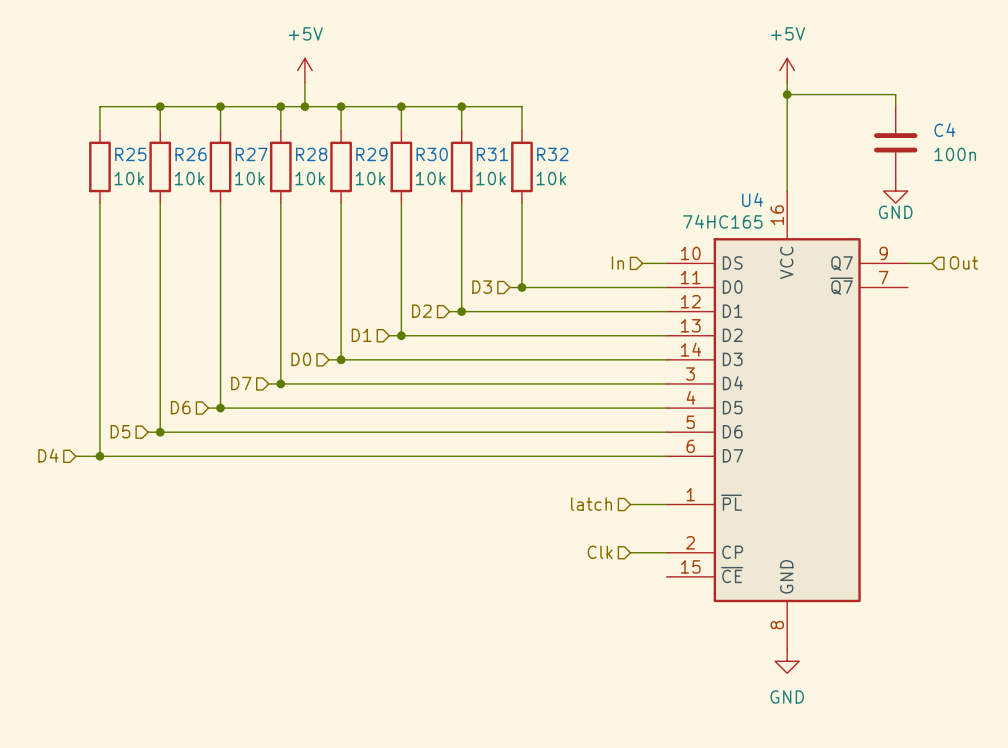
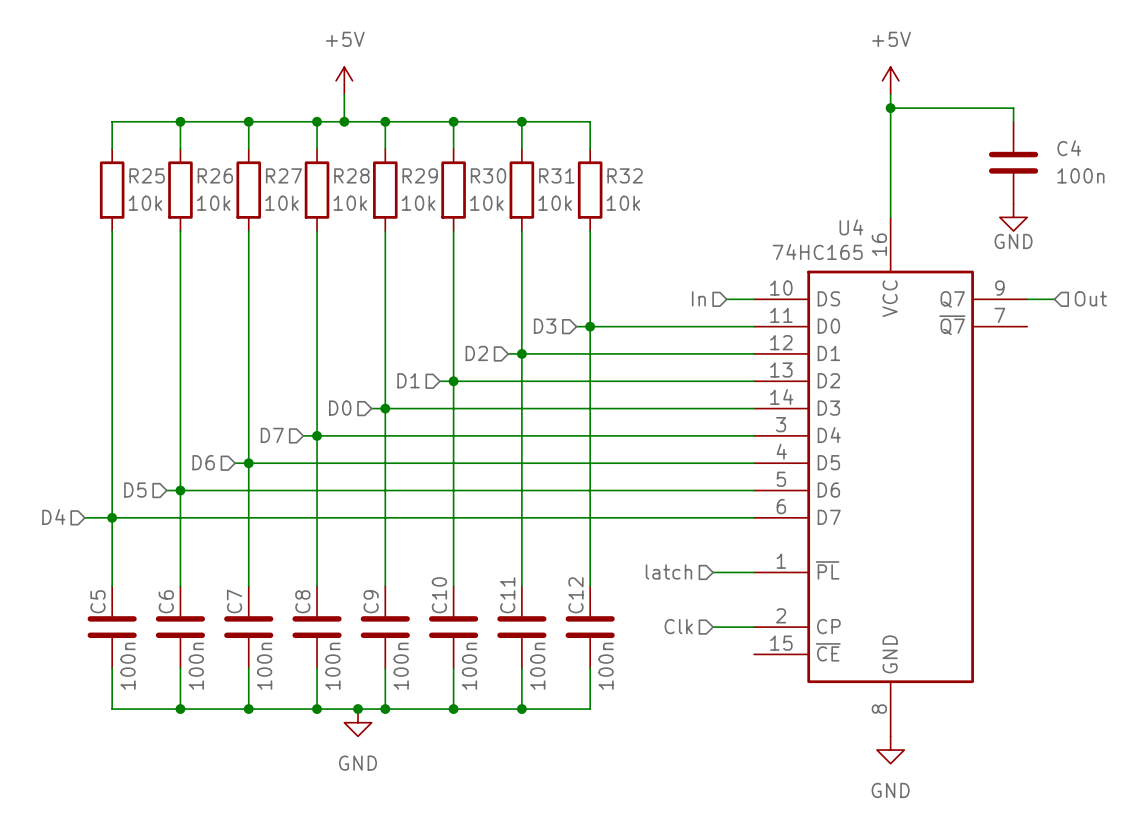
wire: none -> (590, 326) (590, 586)
wire: none -> (521, 353) (521, 586)
wire: none -> (453, 381) (453, 586)
wire: none -> (385, 408) (385, 586)
wire: none -> (317, 435) (317, 586)
wire: none -> (248, 463) (248, 586)
wire: none -> (180, 490) (180, 586)
wire: none -> (112, 517) (112, 586)
C5: none -> 100n (112, 627)
C6: none -> 100n (180, 627)
C7: none -> 100n (248, 627)
C8: none -> 100n (317, 627)
C9: none -> 100n (385, 627)
C10: none -> 100n (453, 627)
C11: none -> 100n (521, 627)
C12: none -> 100n (590, 627)
wire: none -> (112, 668) (112, 709) (590, 709) (590, 668)
wire: none -> (180, 668) (180, 709)
wire: none -> (248, 668) (248, 709)
wire: none -> (317, 668) (317, 709)
wire: none -> (385, 668) (385, 709)
wire: none -> (453, 668) (453, 709)
wire: none -> (521, 668) (521, 709)
junction: none -> (180, 709)
junction: none -> (248, 709)
junction: none -> (317, 709)
junction: none -> (358, 709)
junction: none -> (385, 709)
junction: none -> (453, 709)
junction: none -> (521, 709)
power symbol: none -> GND (358, 722)

